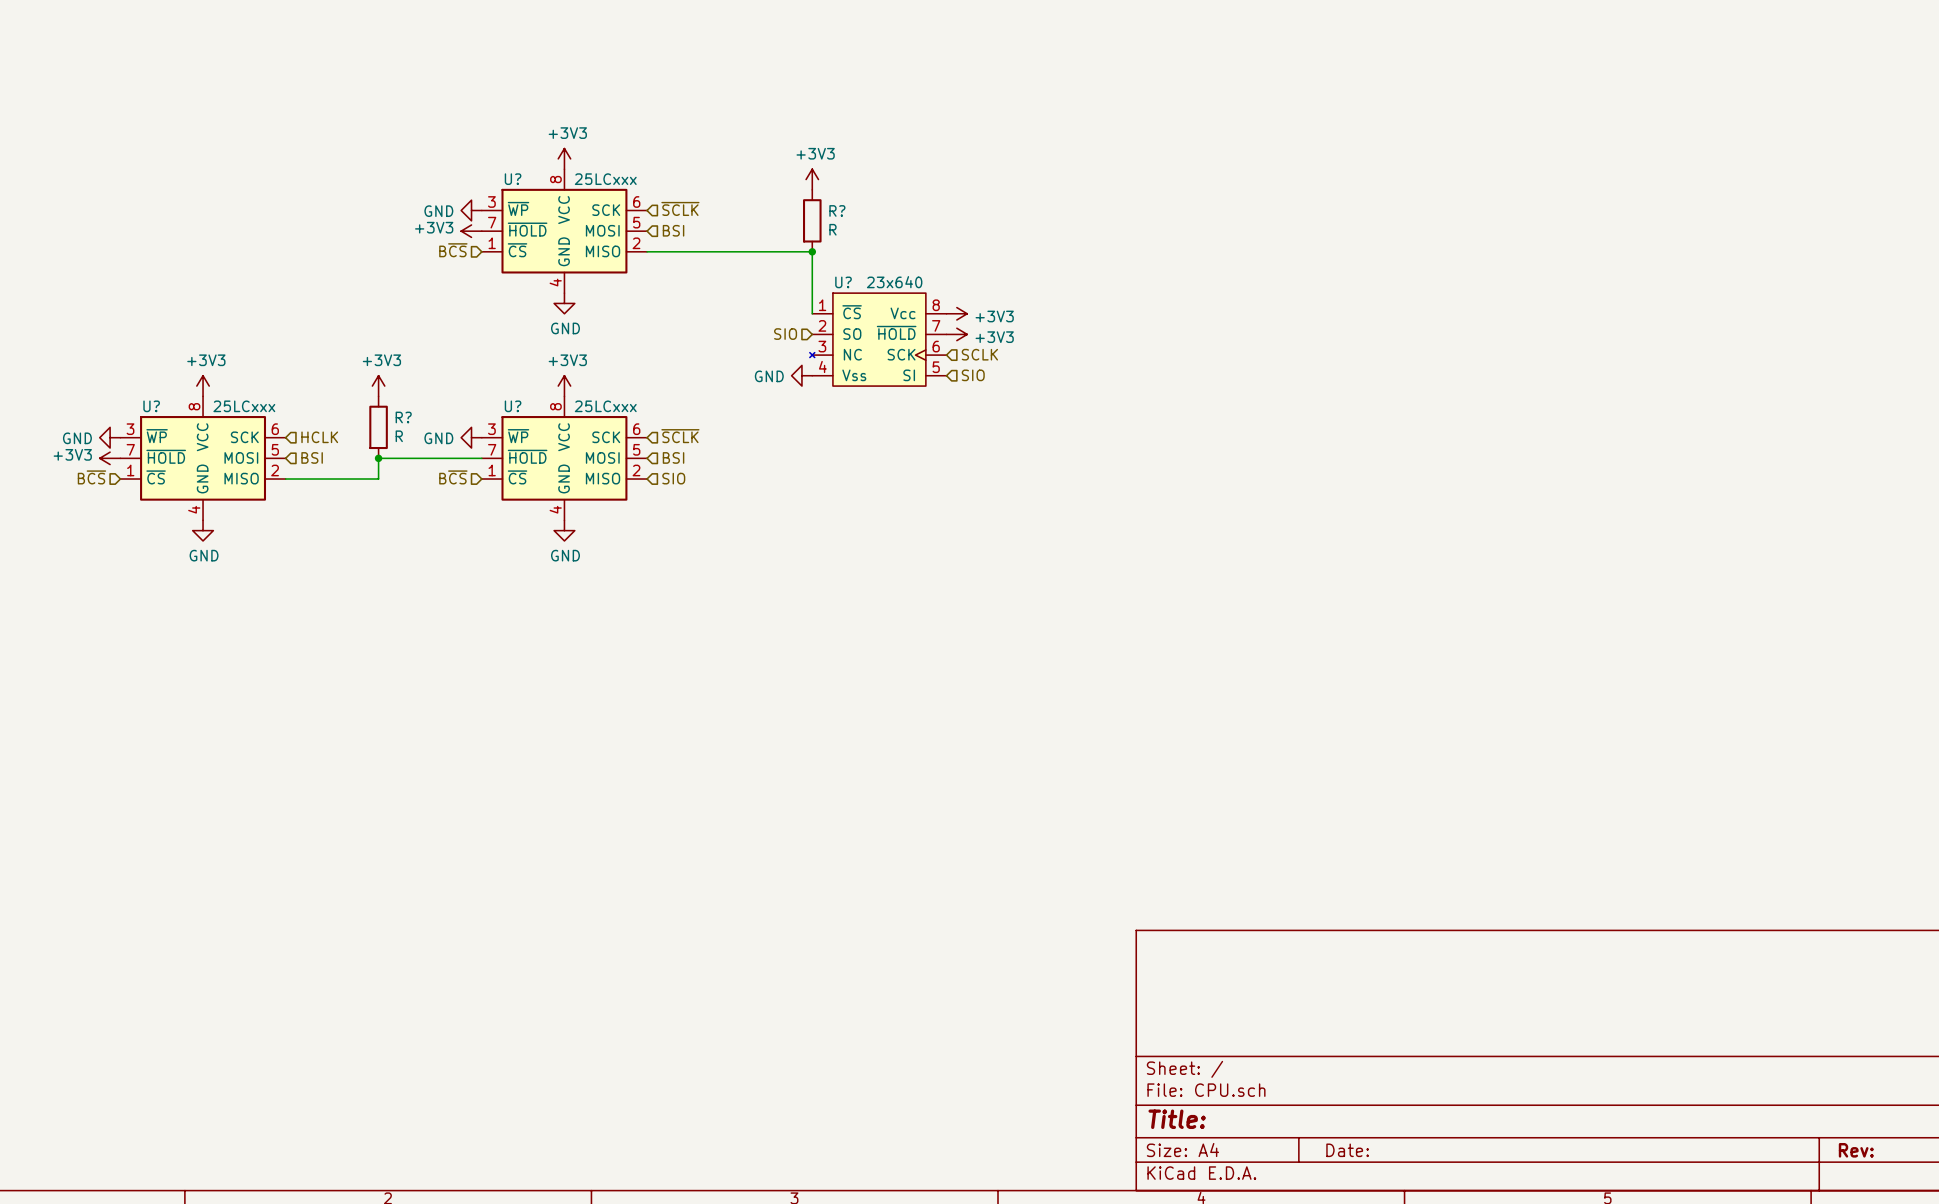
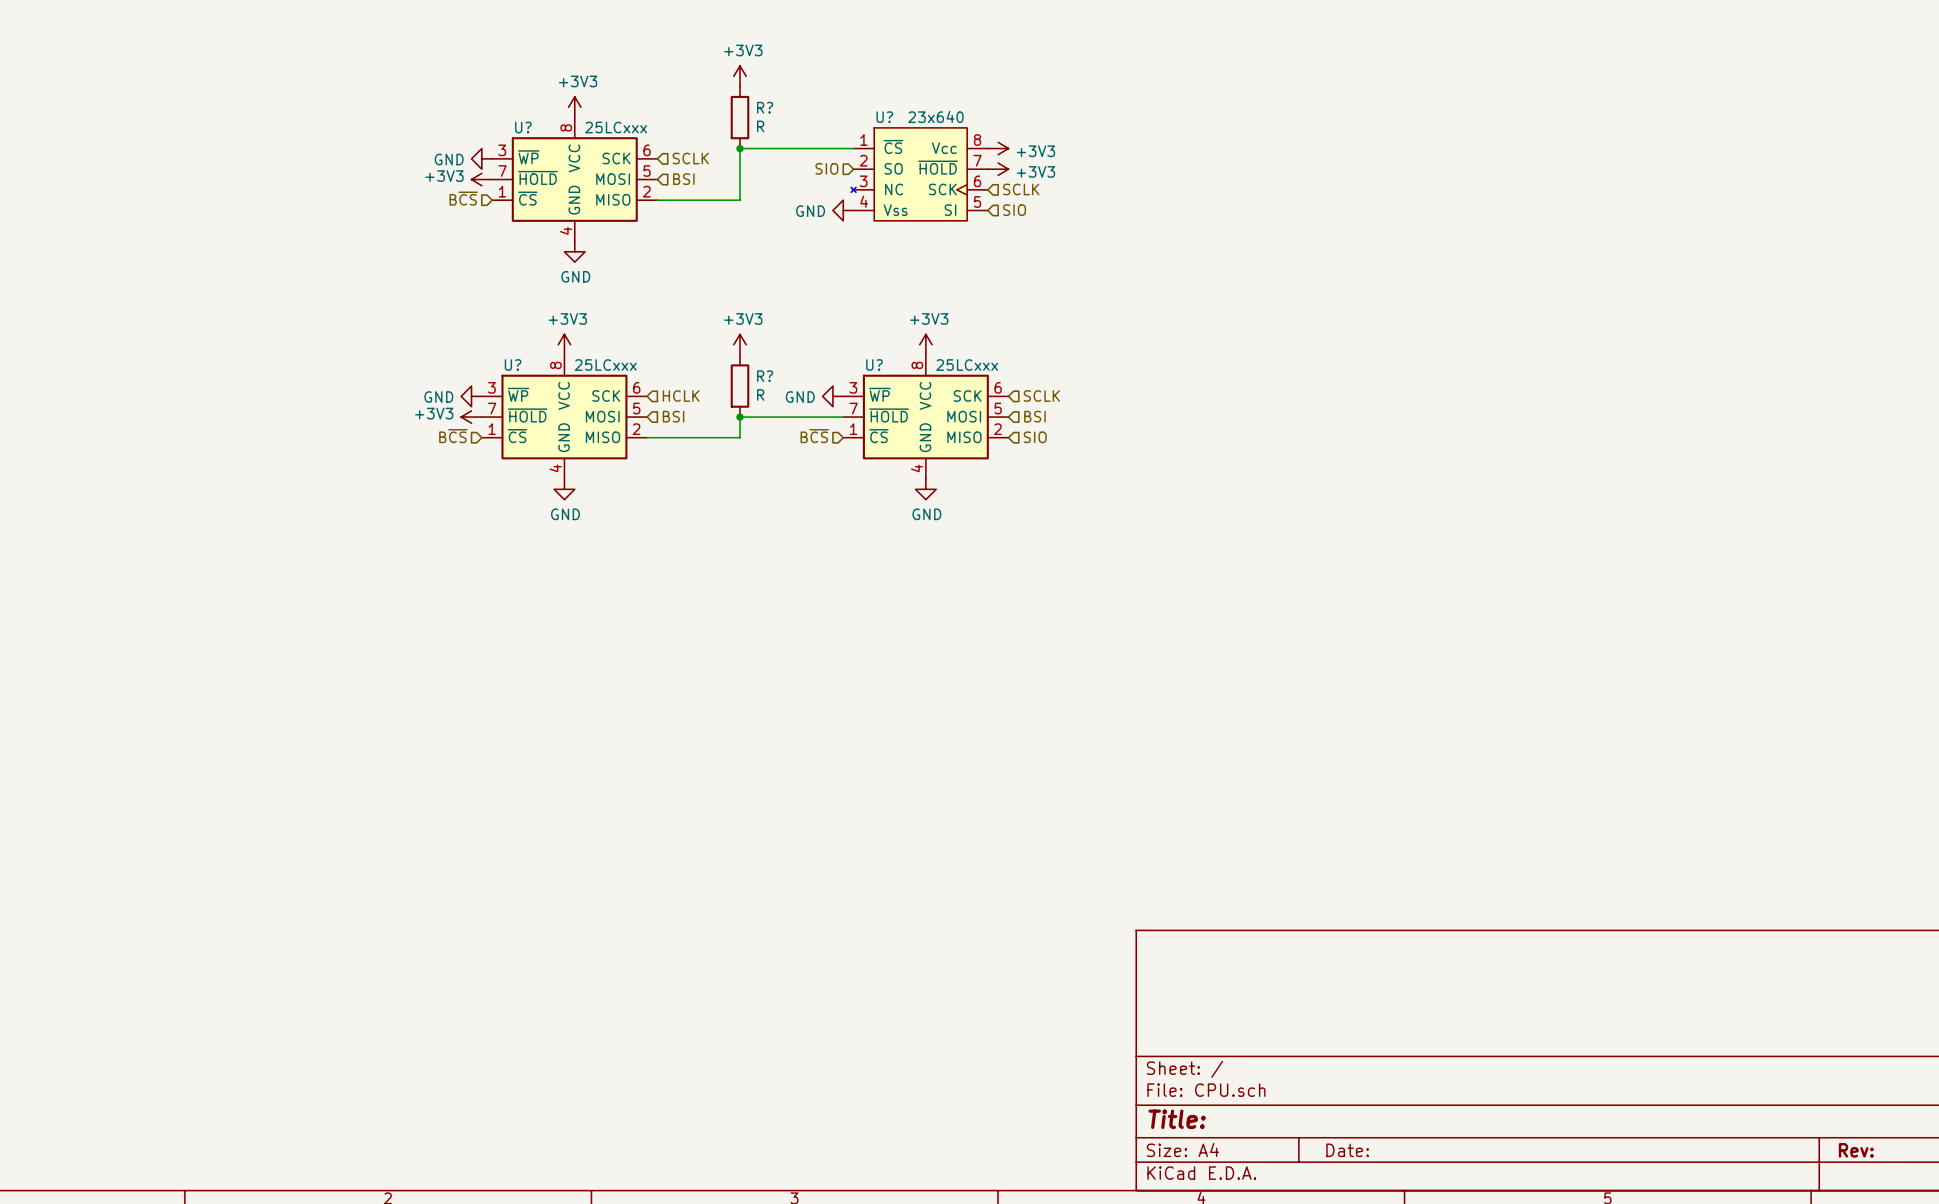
power symbol: none -> +3V3 (740, 76)
power symbol: none -> +3V3 (574, 107)
R?: none -> R (740, 117)
junction: none -> (740, 148)
wire: none -> (853, 148) (740, 148) (740, 200) (657, 200)
power symbol: none -> +3V3 (998, 148)
power symbol: +3V3 (564, 158) -> none
hierarchical label: none -> SCLK (690, 158)
hierarchical label: none -> SIO (826, 168)
power symbol: none -> +3V3 (998, 169)
power symbol: none -> +3V3 (481, 179)
power symbol: +3V3 (812, 179) -> none
hierarchical label: none -> SCLK (1021, 189)
hierarchical label: ~{SCLK} (680, 208) -> none
power symbol position: GND (471, 210) -> GND (481, 158)
power symbol: none -> GND (843, 210)
hierarchical label: none -> SIO (1014, 210)
R?: R (812, 220) -> none
hierarchical label position: BSI (673, 230) -> BSI (683, 179)
power symbol: +3V3 (471, 231) -> none
U? position: (564, 231) -> (574, 179)
hierarchical label position: B~{CS} (453, 250) -> B~{CS} (463, 198)
wire: (647, 251) (812, 251) (812, 313) -> none
junction: (812, 251) -> none
power symbol position: GND (564, 303) -> GND (574, 251)
power symbol: +3V3 (956, 313) -> none
hierarchical label: SIO (785, 334) -> none
power symbol: +3V3 (956, 334) -> none
U? position: (858, 339) -> (900, 174)
power symbol: none -> +3V3 (740, 344)
power symbol: none -> +3V3 (925, 344)
hierarchical label position: SCLK (979, 354) -> SCLK (1041, 396)
power symbol position: GND (801, 375) -> GND (832, 396)
hierarchical label: SIO (973, 375) -> none
power symbol: +3V3 (203, 386) -> none
power symbol: +3V3 (378, 386) -> none
power symbol position: +3V3 (564, 386) -> +3V3 (564, 344)
R?: none -> R (740, 386)
hierarchical label: none -> HCLK (681, 396)
hierarchical label: none -> BSI (1034, 416)
power symbol: none -> +3V3 (471, 417)
junction: none -> (740, 417)
wire: none -> (843, 417) (740, 417) (740, 437) (647, 437)
U?: none -> 25LCxxx (925, 417)
R?: R (378, 427) -> none
hierarchical label: ~{SCLK} (680, 436) -> none
hierarchical label: none -> B~{CS} (814, 436)
power symbol: GND (110, 437) -> none
hierarchical label: HCLK (319, 437) -> none
power symbol position: GND (471, 437) -> GND (471, 396)
hierarchical label: none -> SIO (1035, 437)
hierarchical label: BSI (312, 457) -> none
hierarchical label position: BSI (673, 457) -> BSI (673, 416)
power symbol: +3V3 (110, 458) -> none
U?: 25LCxxx (203, 458) -> none
junction: (378, 458) -> none
wire: (481, 458) (378, 458) (378, 479) (285, 479) -> none
U? position: (564, 458) -> (564, 417)
hierarchical label: B~{CS} (91, 477) -> none
hierarchical label position: B~{CS} (453, 477) -> B~{CS} (453, 436)
hierarchical label: SIO (673, 478) -> none
power symbol: none -> GND (925, 489)
power symbol: GND (203, 530) -> none
power symbol position: GND (564, 530) -> GND (564, 489)

